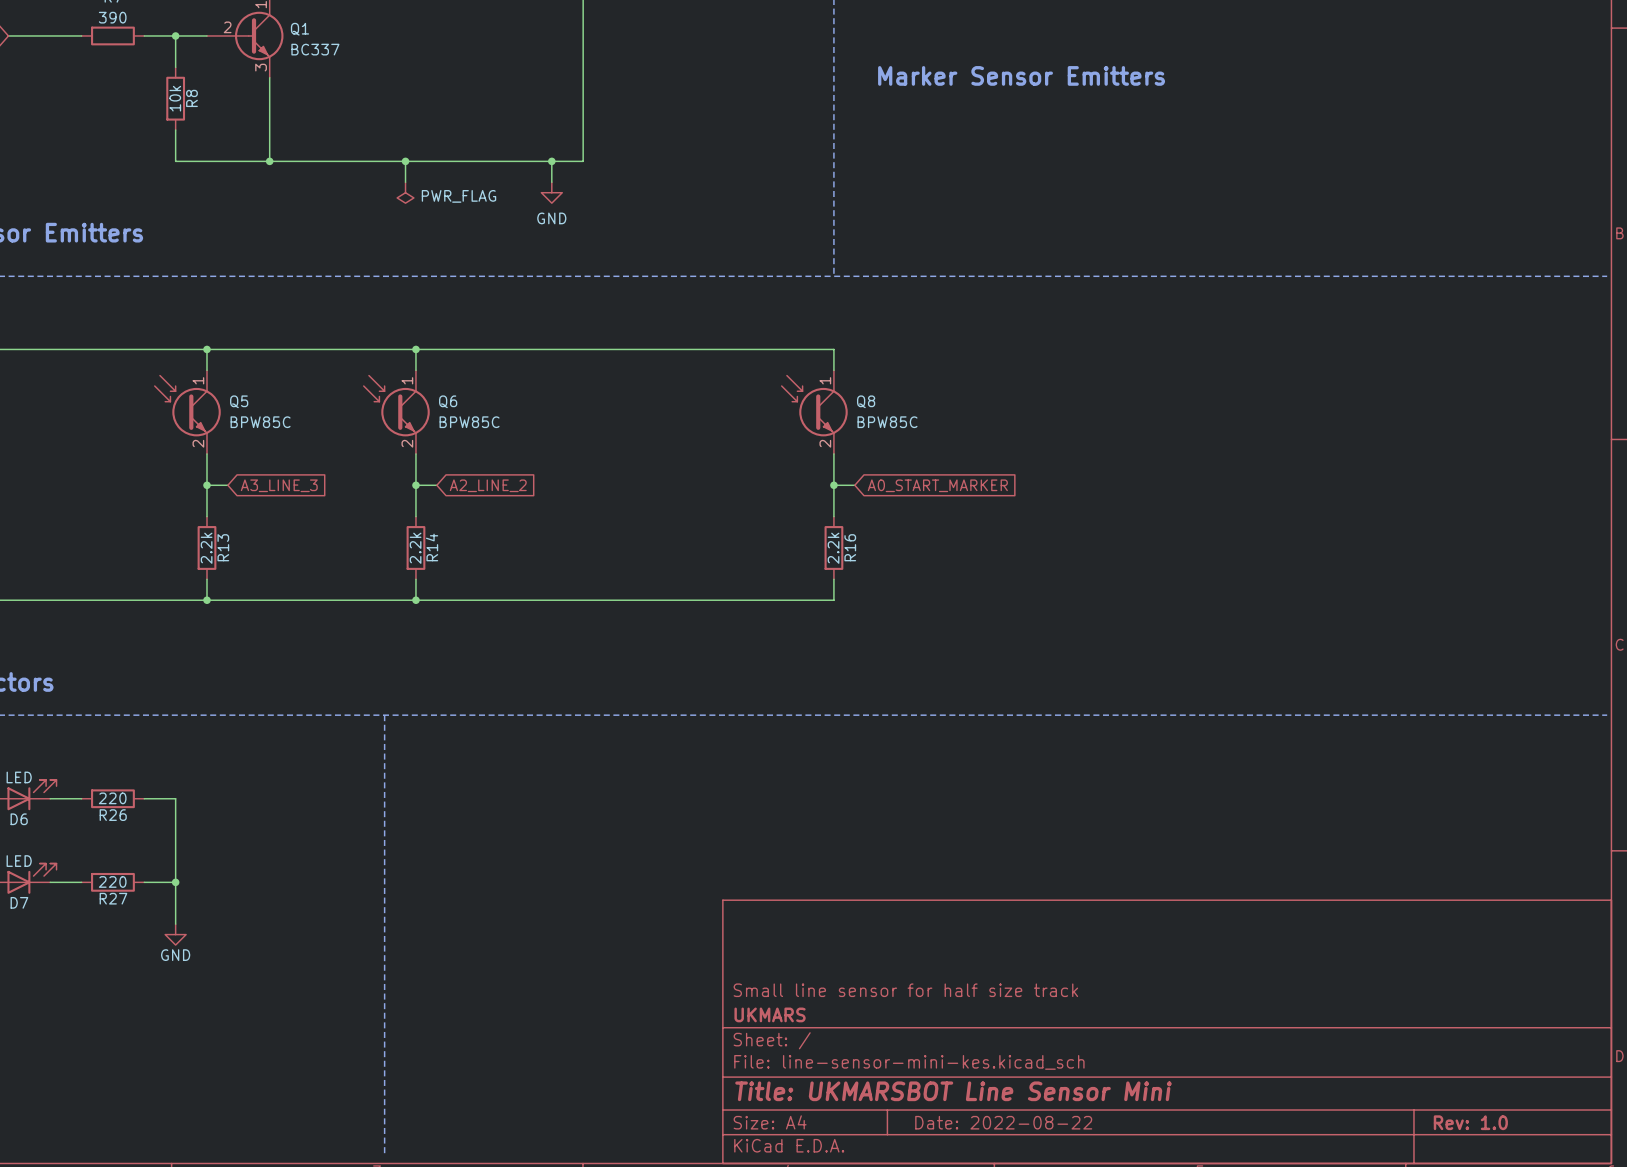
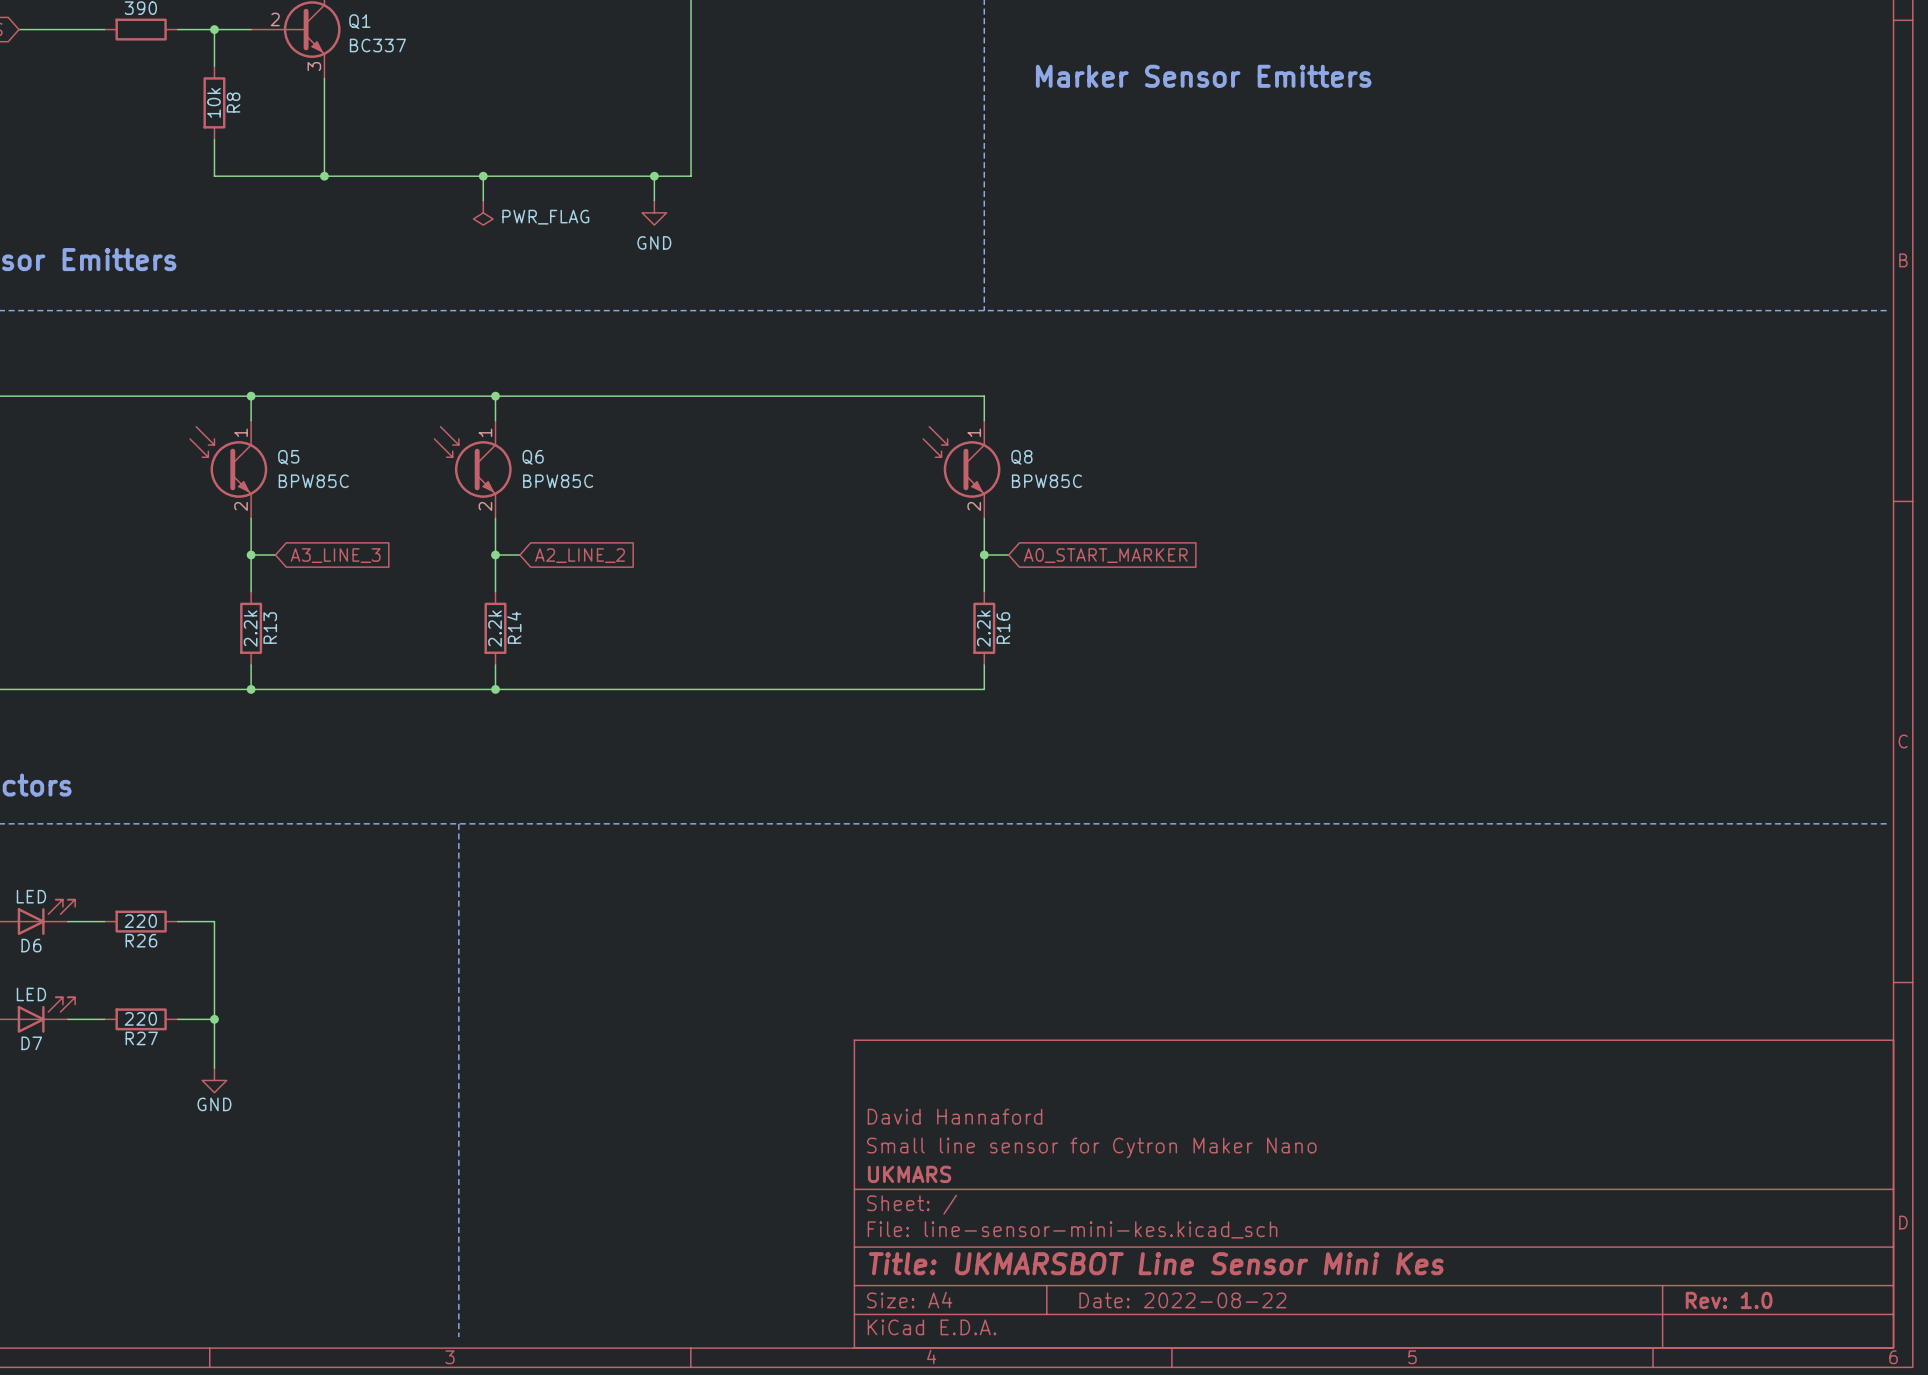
title block: none -> David Hannaford (955, 1116)
title block: Small line sensor for half size track (905, 990) -> Small line sensor for Cytron Maker Nano (1091, 1147)
title block: Title: UKMARSBOT Line Sensor Mini (953, 1091) -> Title: UKMARSBOT Line Sensor Mini Kes (1156, 1263)

